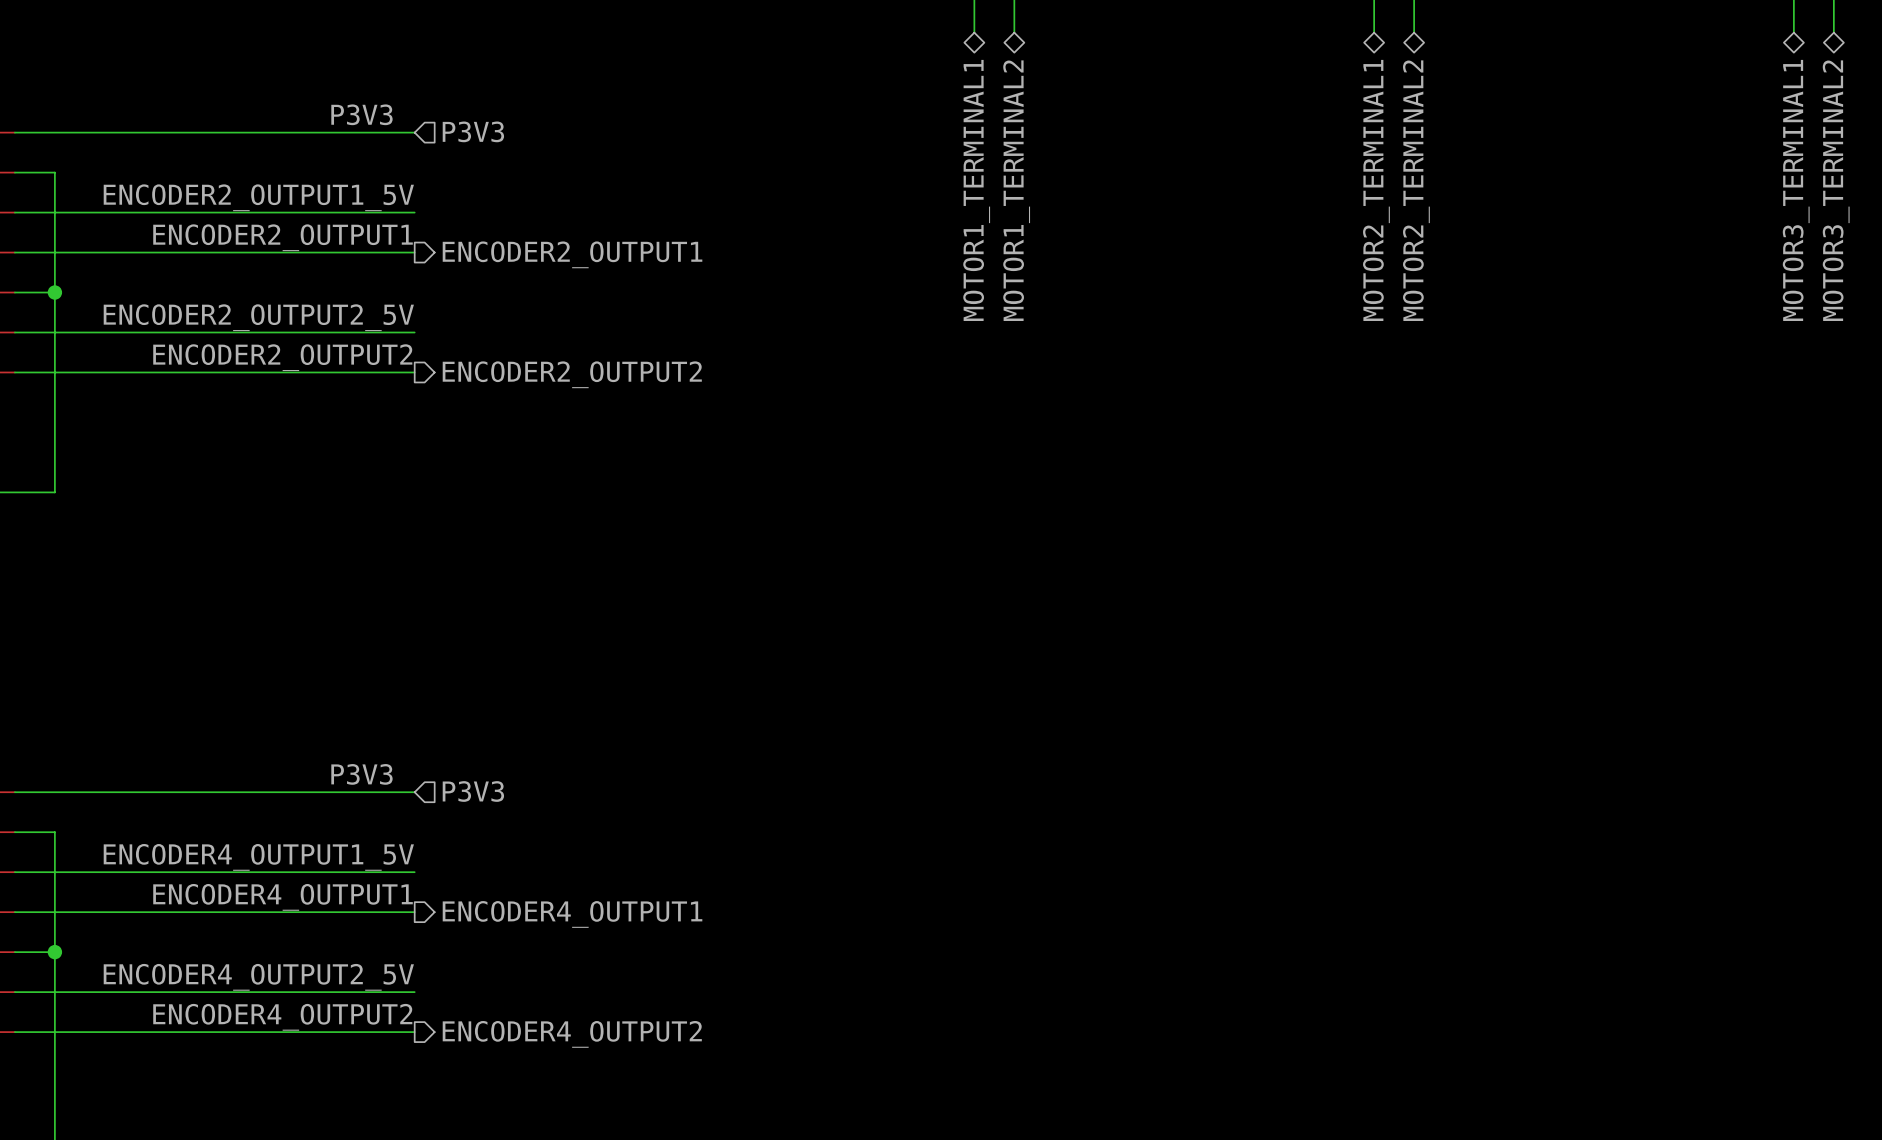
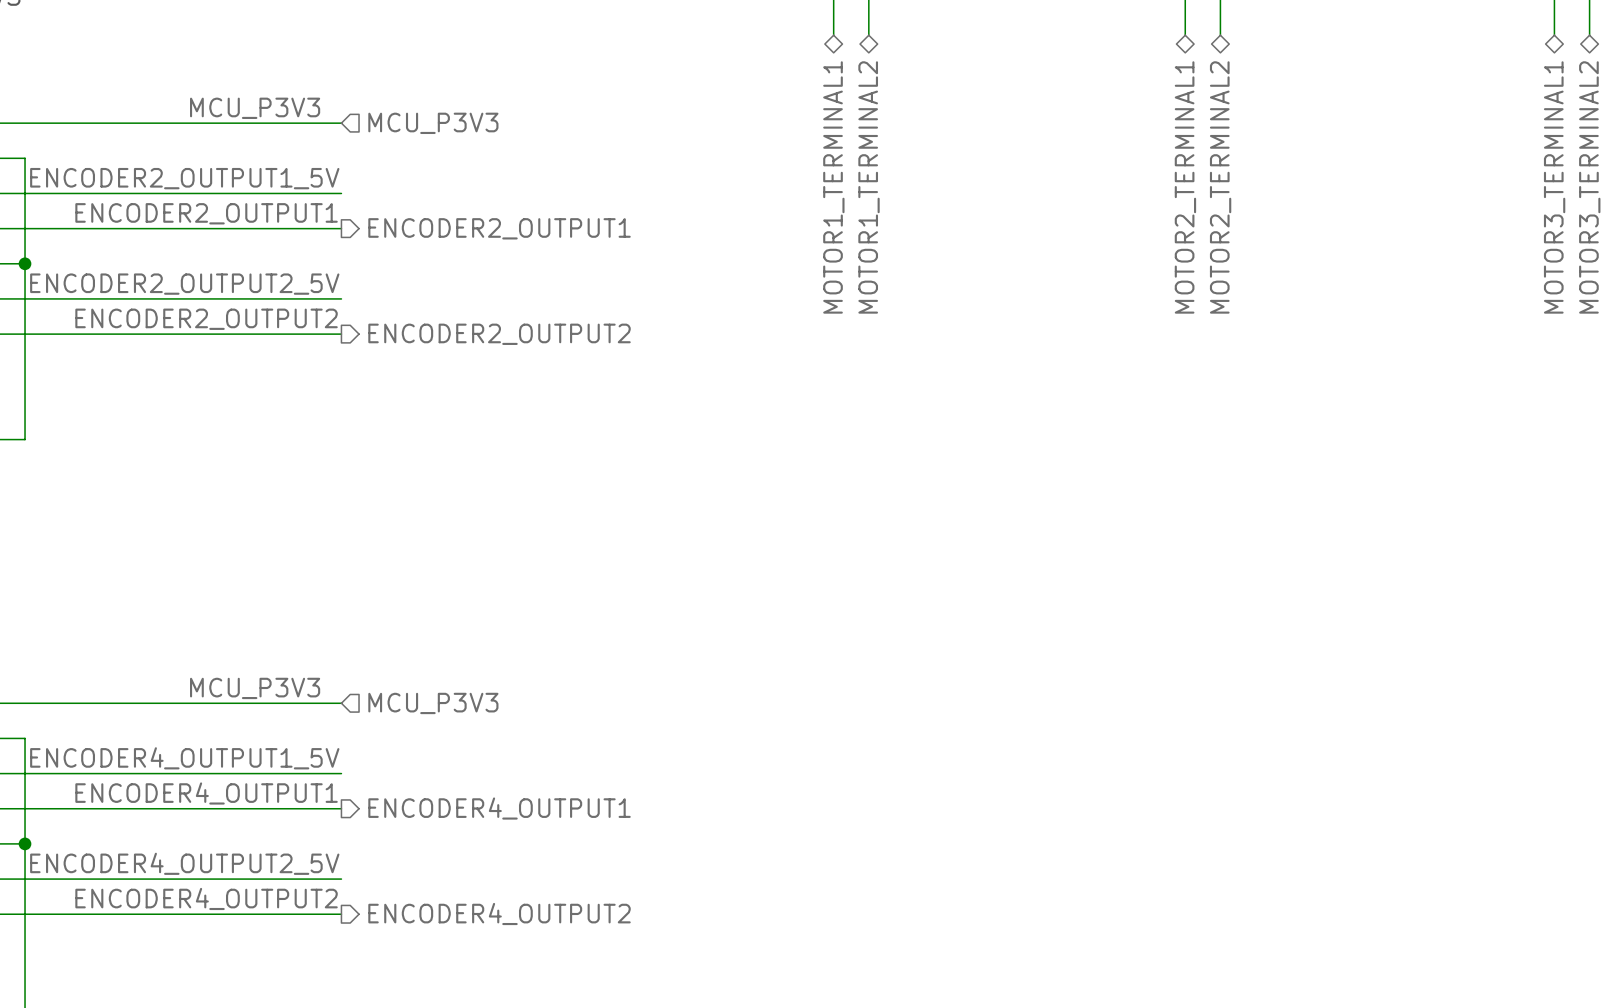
label: P3V3 (361, 114) -> MCU_P3V3 (255, 108)
hierarchical label: P3V3 (473, 131) -> MCU_P3V3 (433, 123)
label: P3V3 (361, 774) -> MCU_P3V3 (255, 688)
hierarchical label: P3V3 (473, 791) -> MCU_P3V3 (433, 703)

